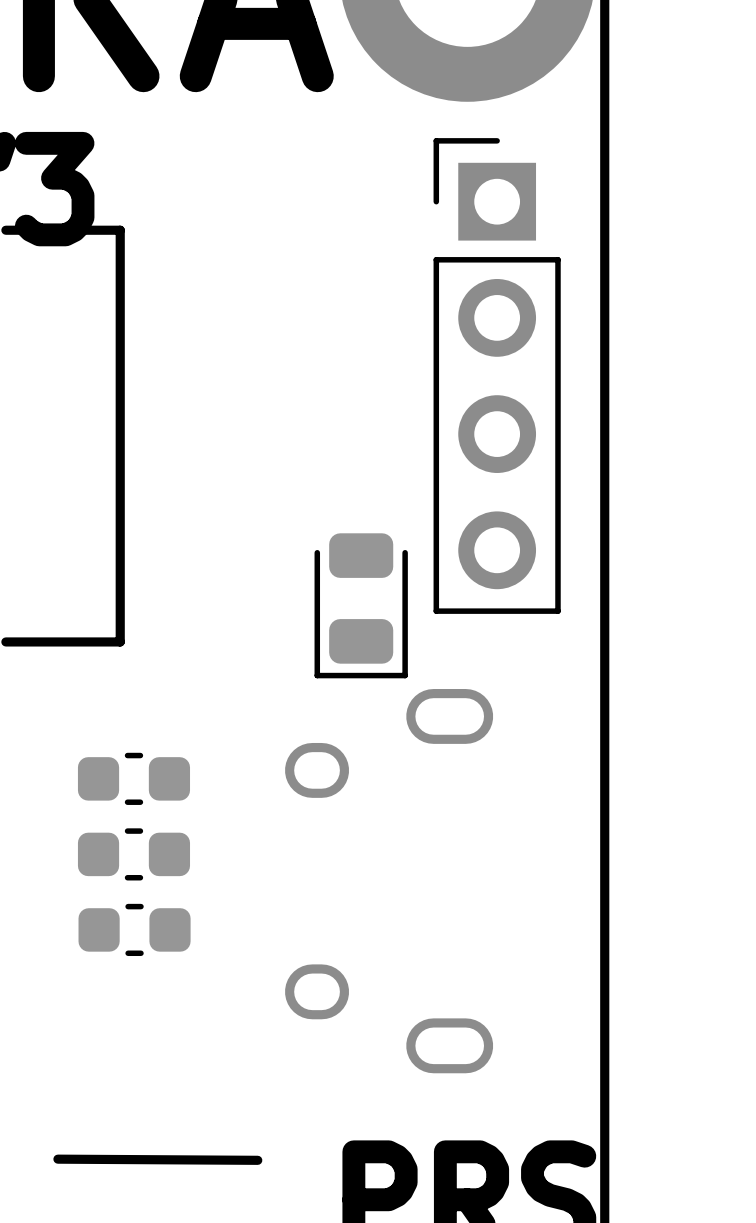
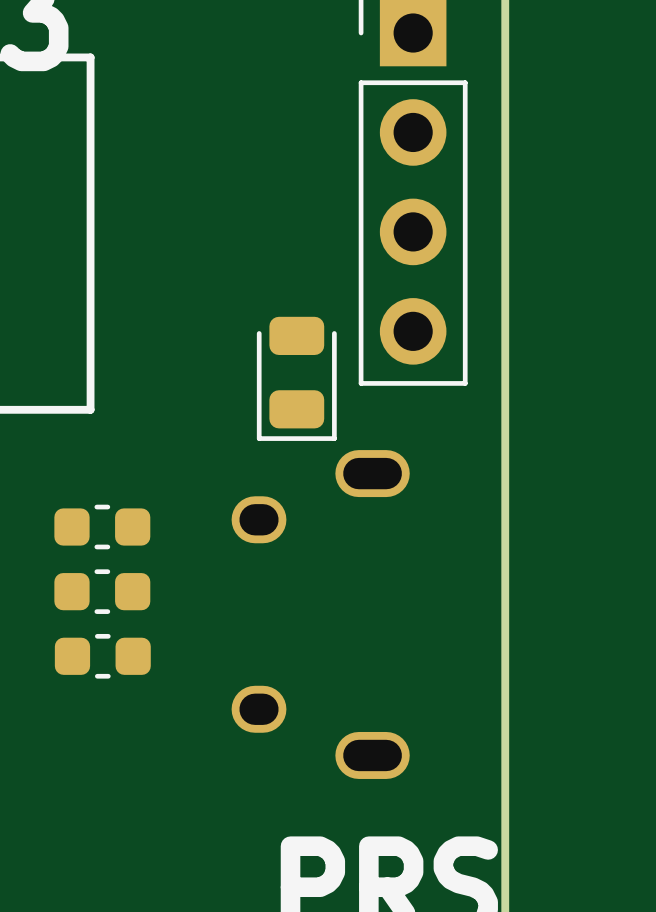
line: (57, 1159) (257, 1160) -> none

